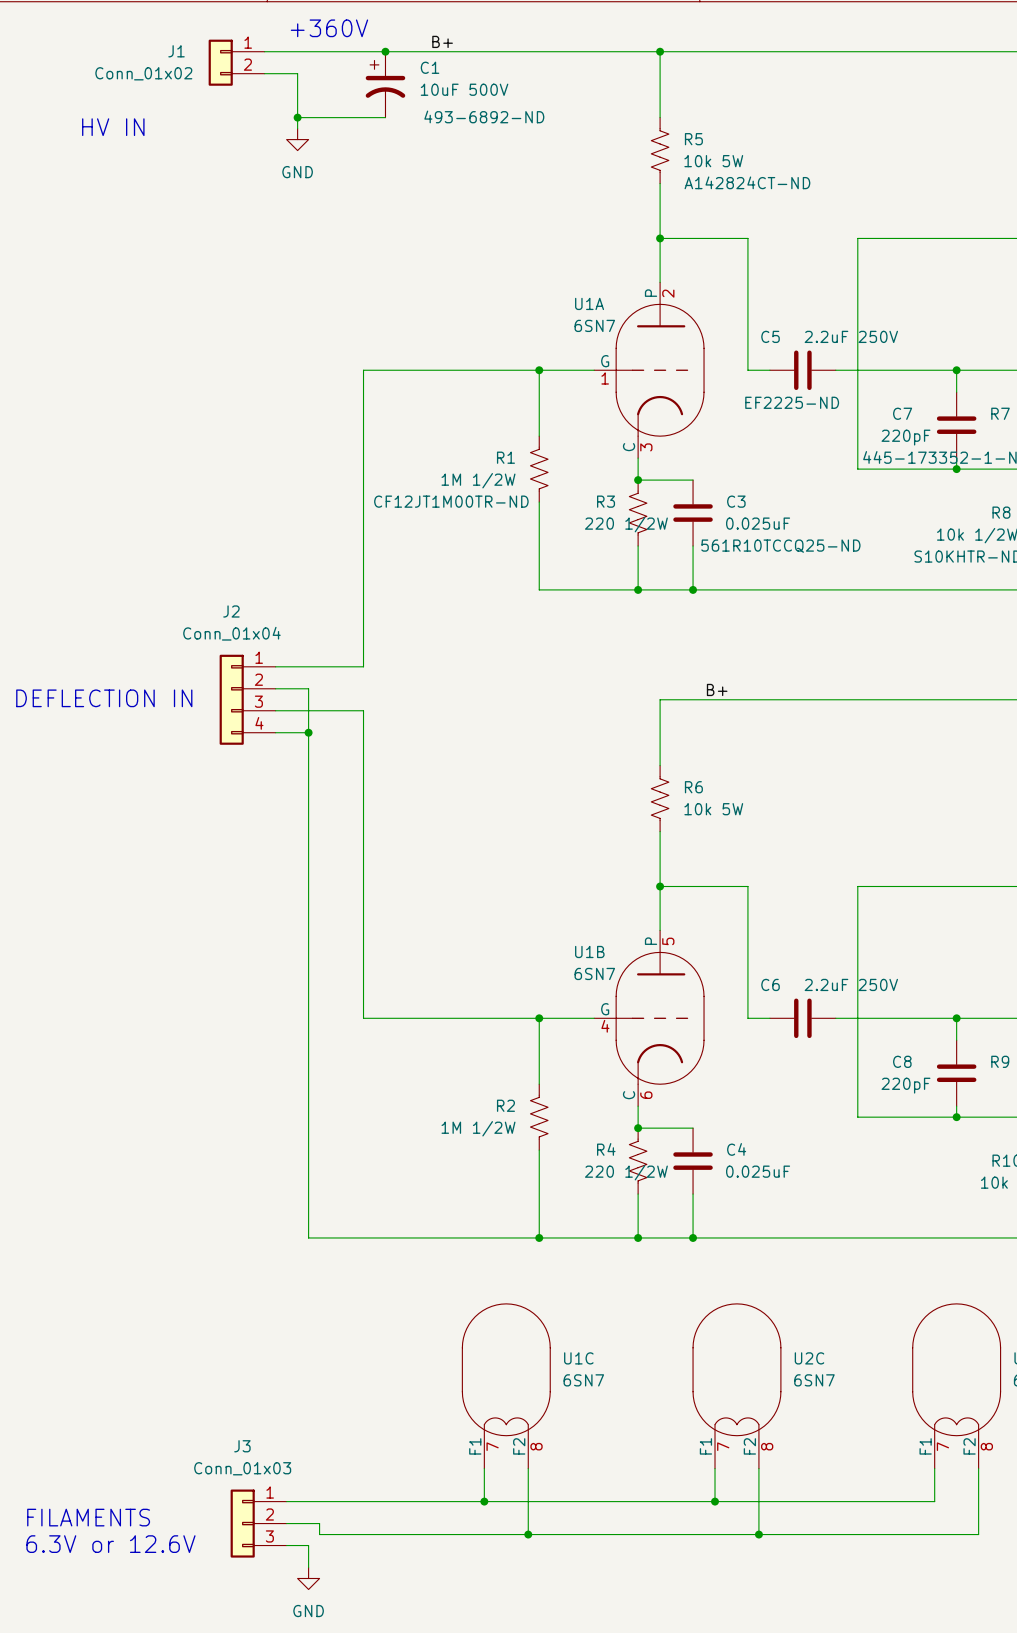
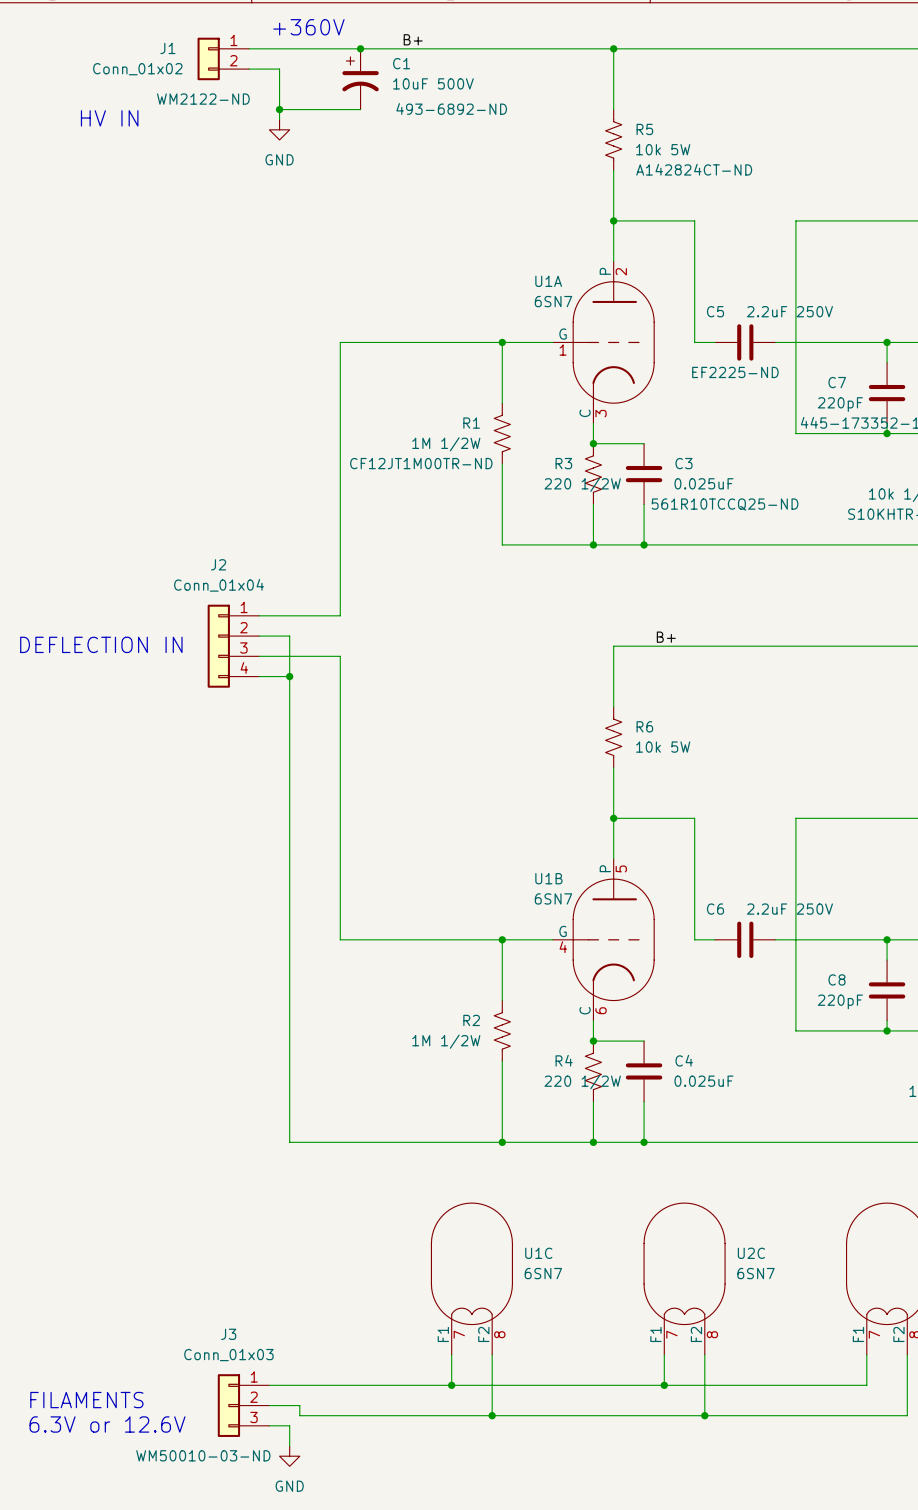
J1 text: none -> WM2122-ND (203, 99)
J3 text: none -> WM50010-03-ND (203, 1455)

